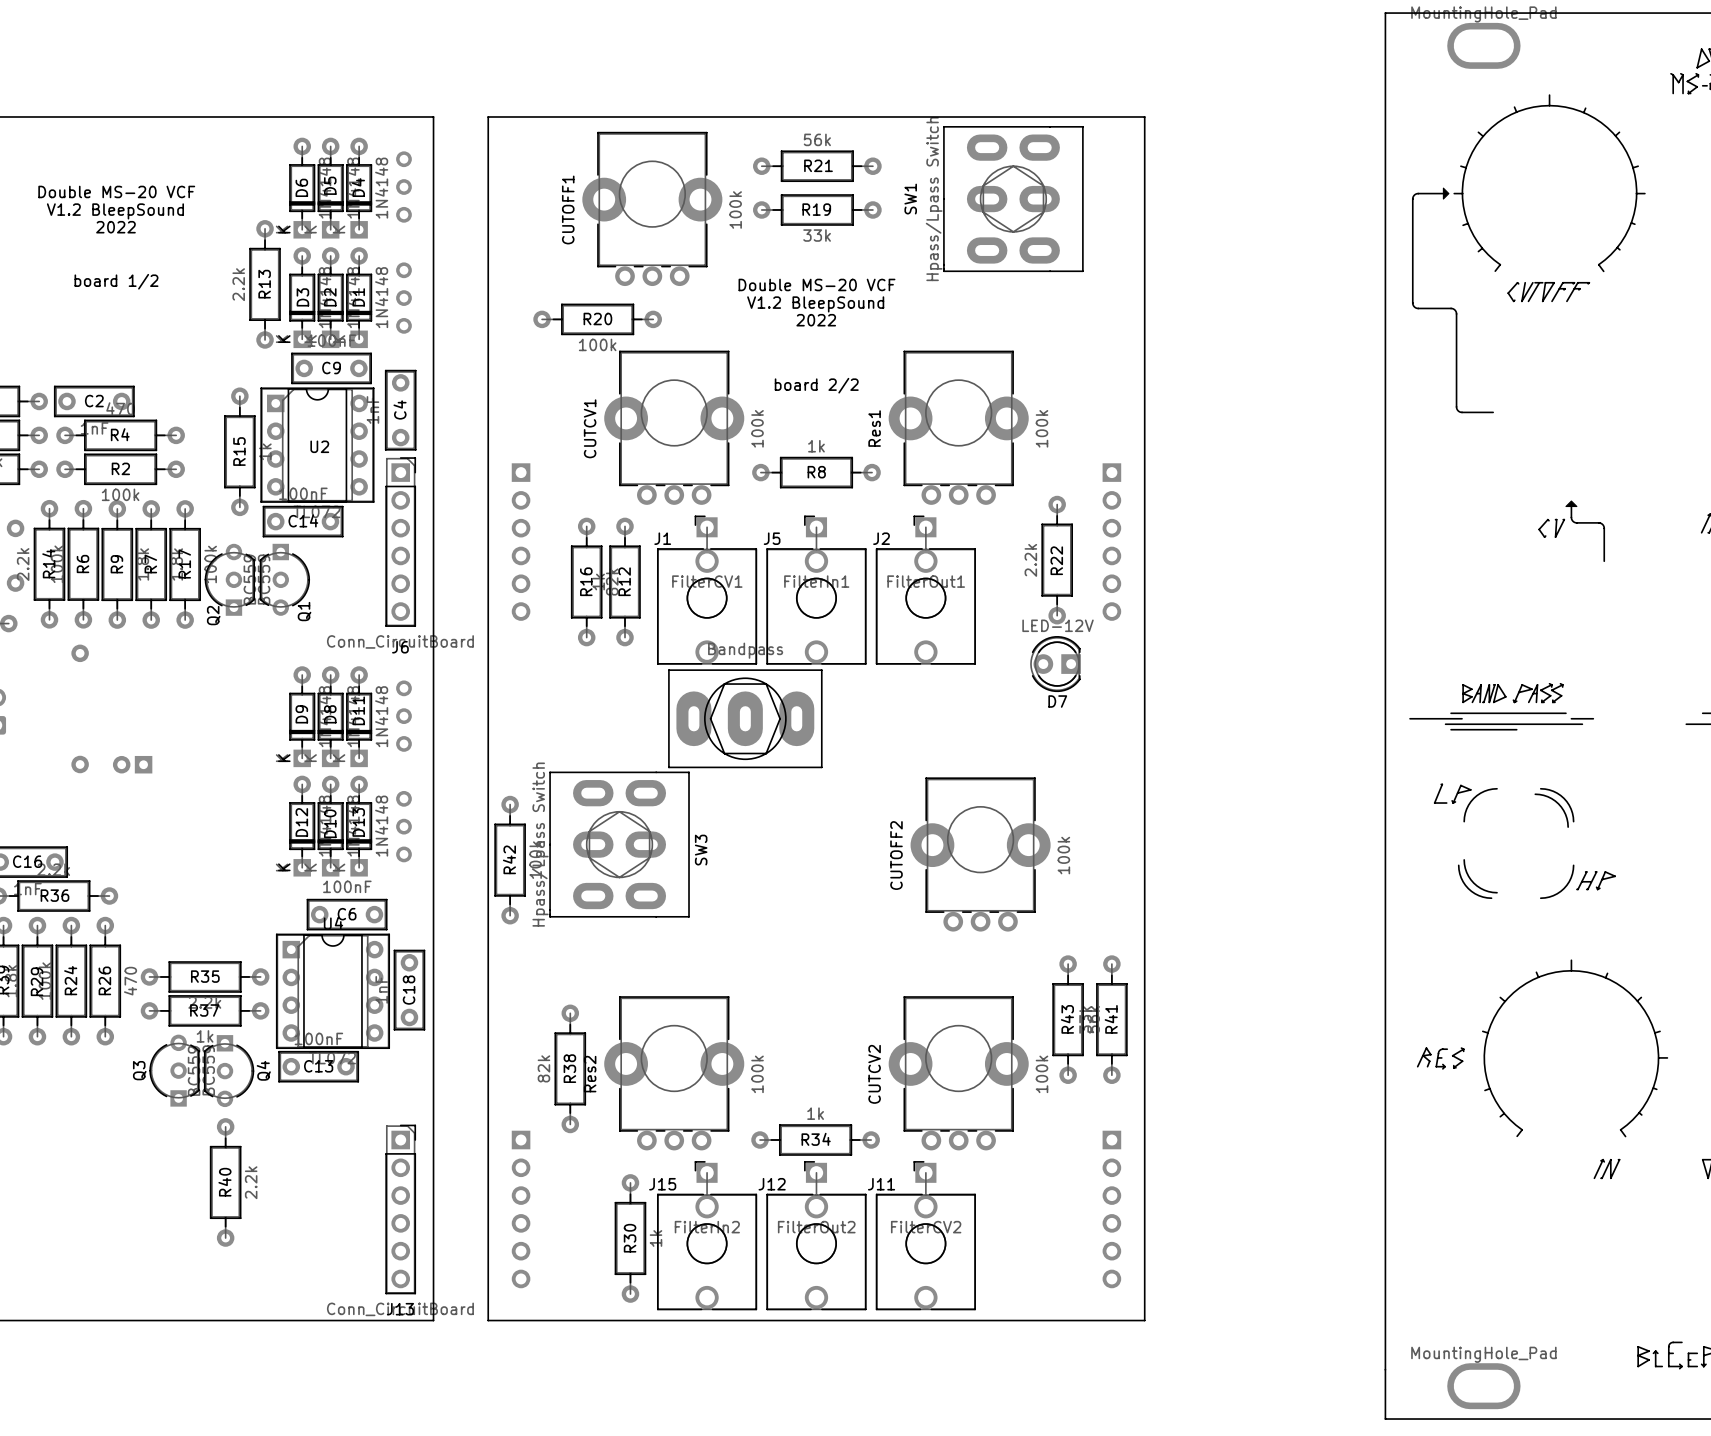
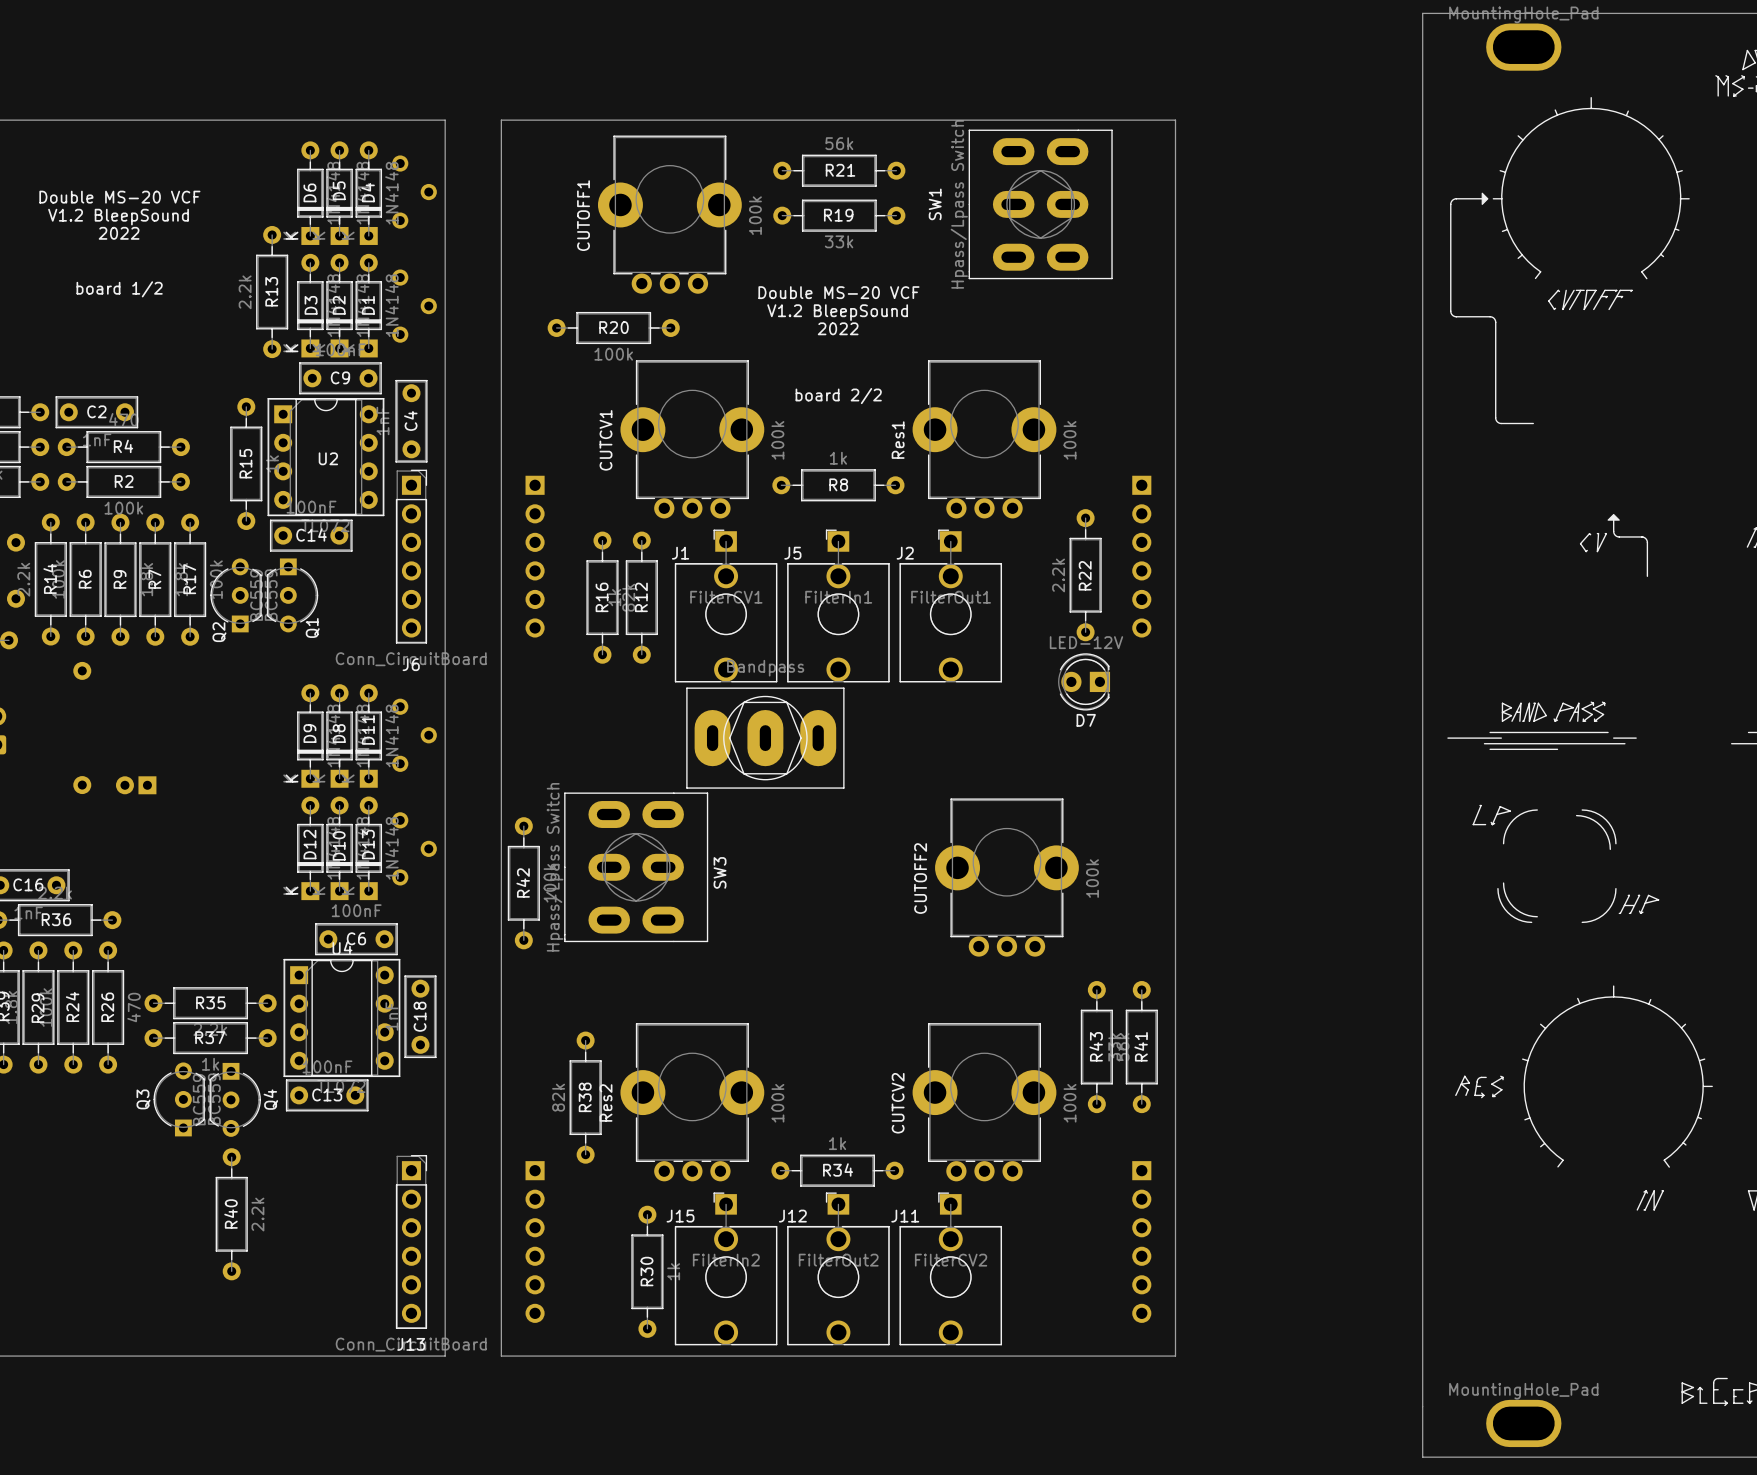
part footprint: [396, 151, 412, 223] -> [392, 155, 437, 229]
part footprint: [396, 262, 412, 334] -> [392, 269, 437, 343]
part footprint: [396, 680, 412, 752] -> [392, 698, 437, 772]
part footprint: [396, 790, 412, 863] -> [392, 812, 437, 886]

